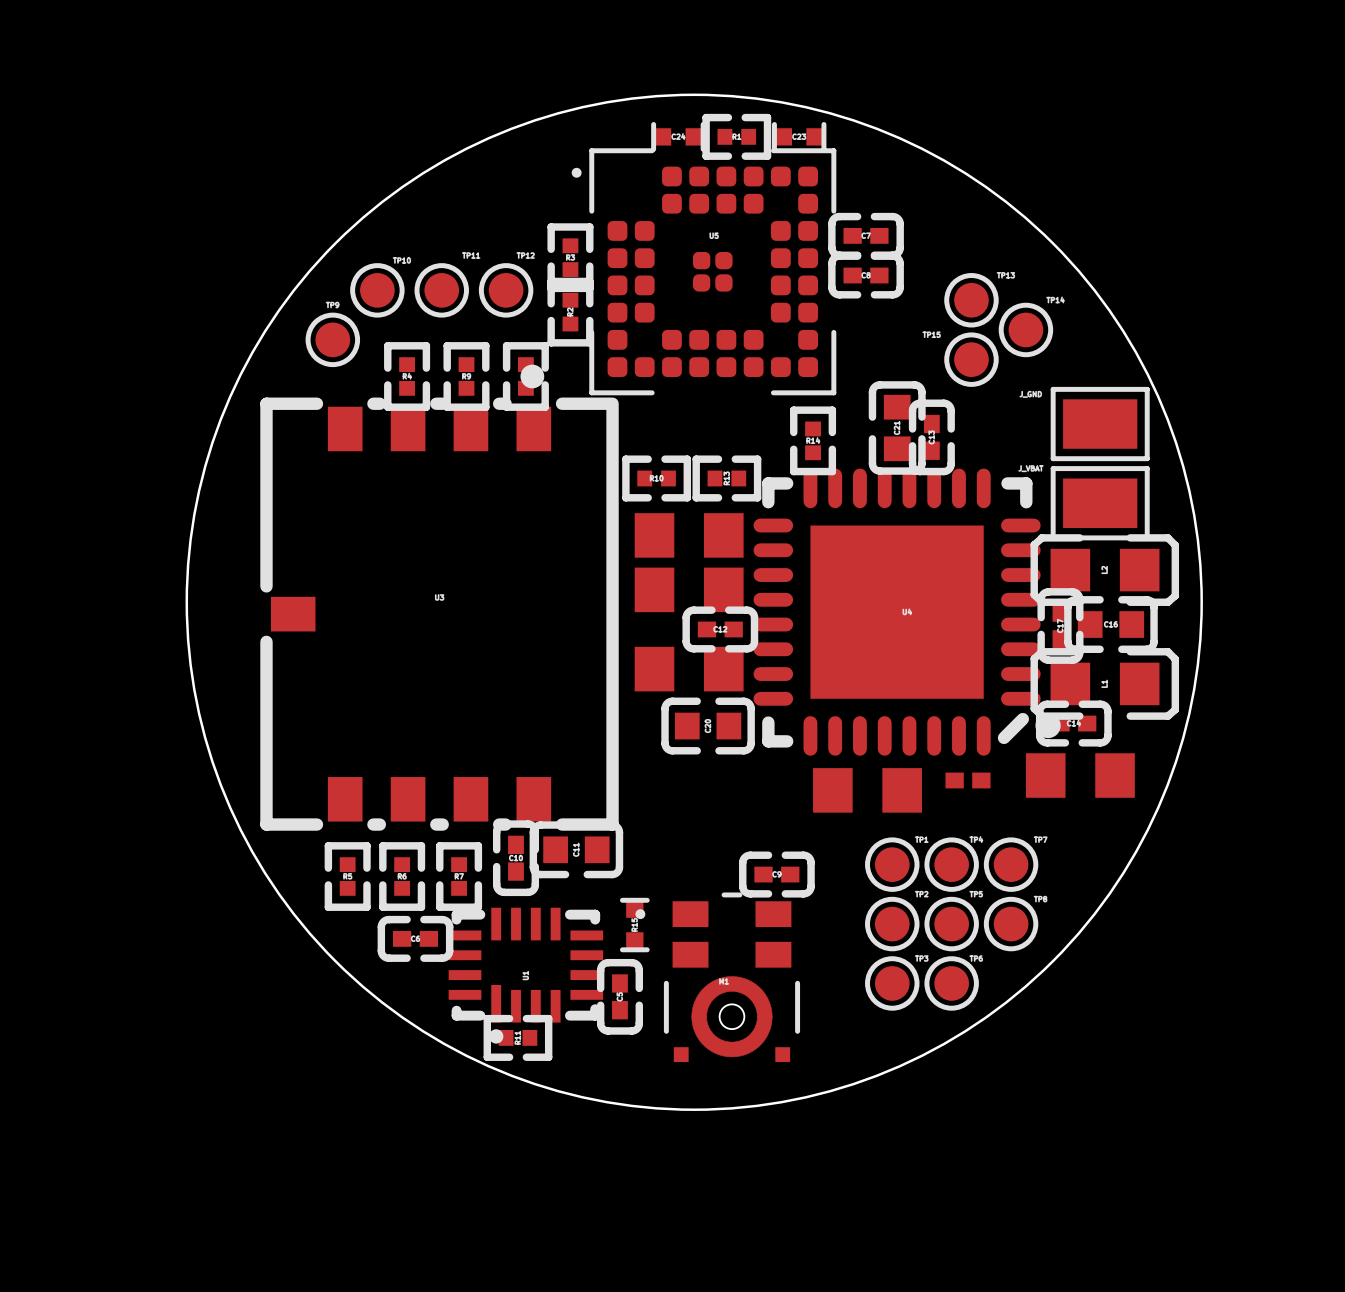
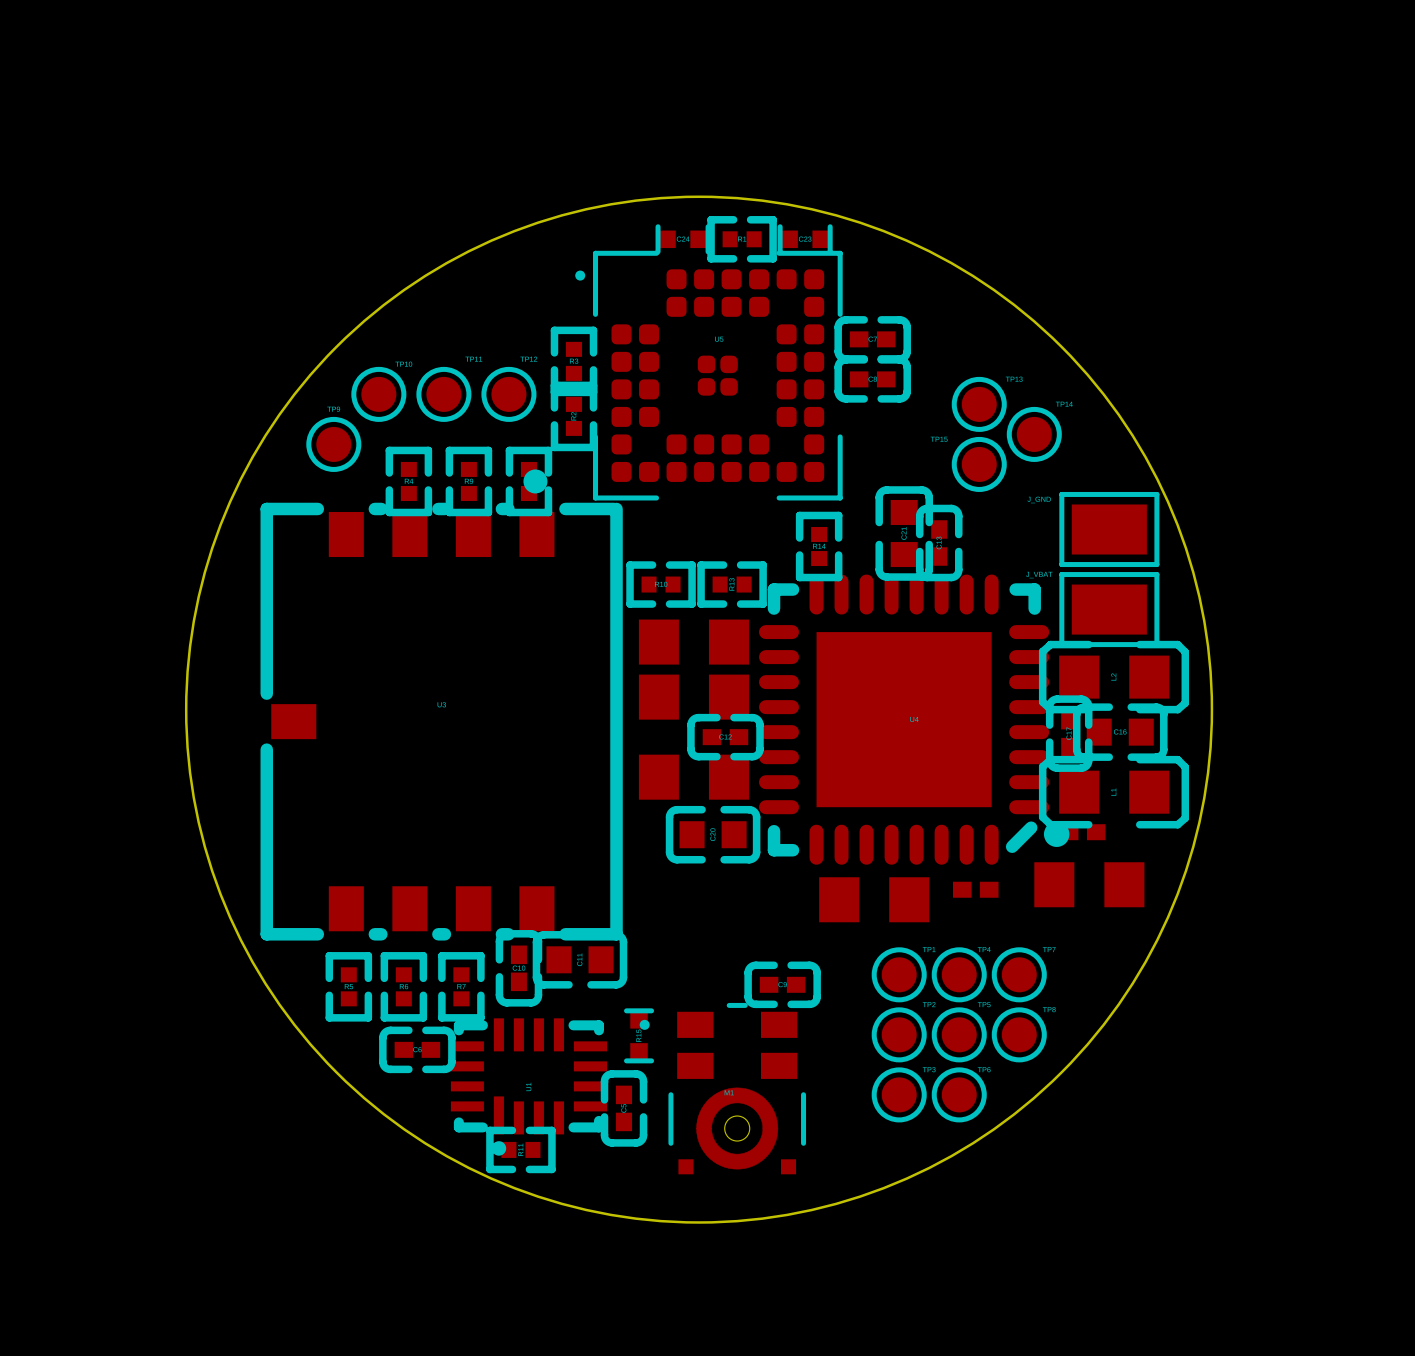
part: (1073, 723) -> none
part: none -> (1082, 832)

